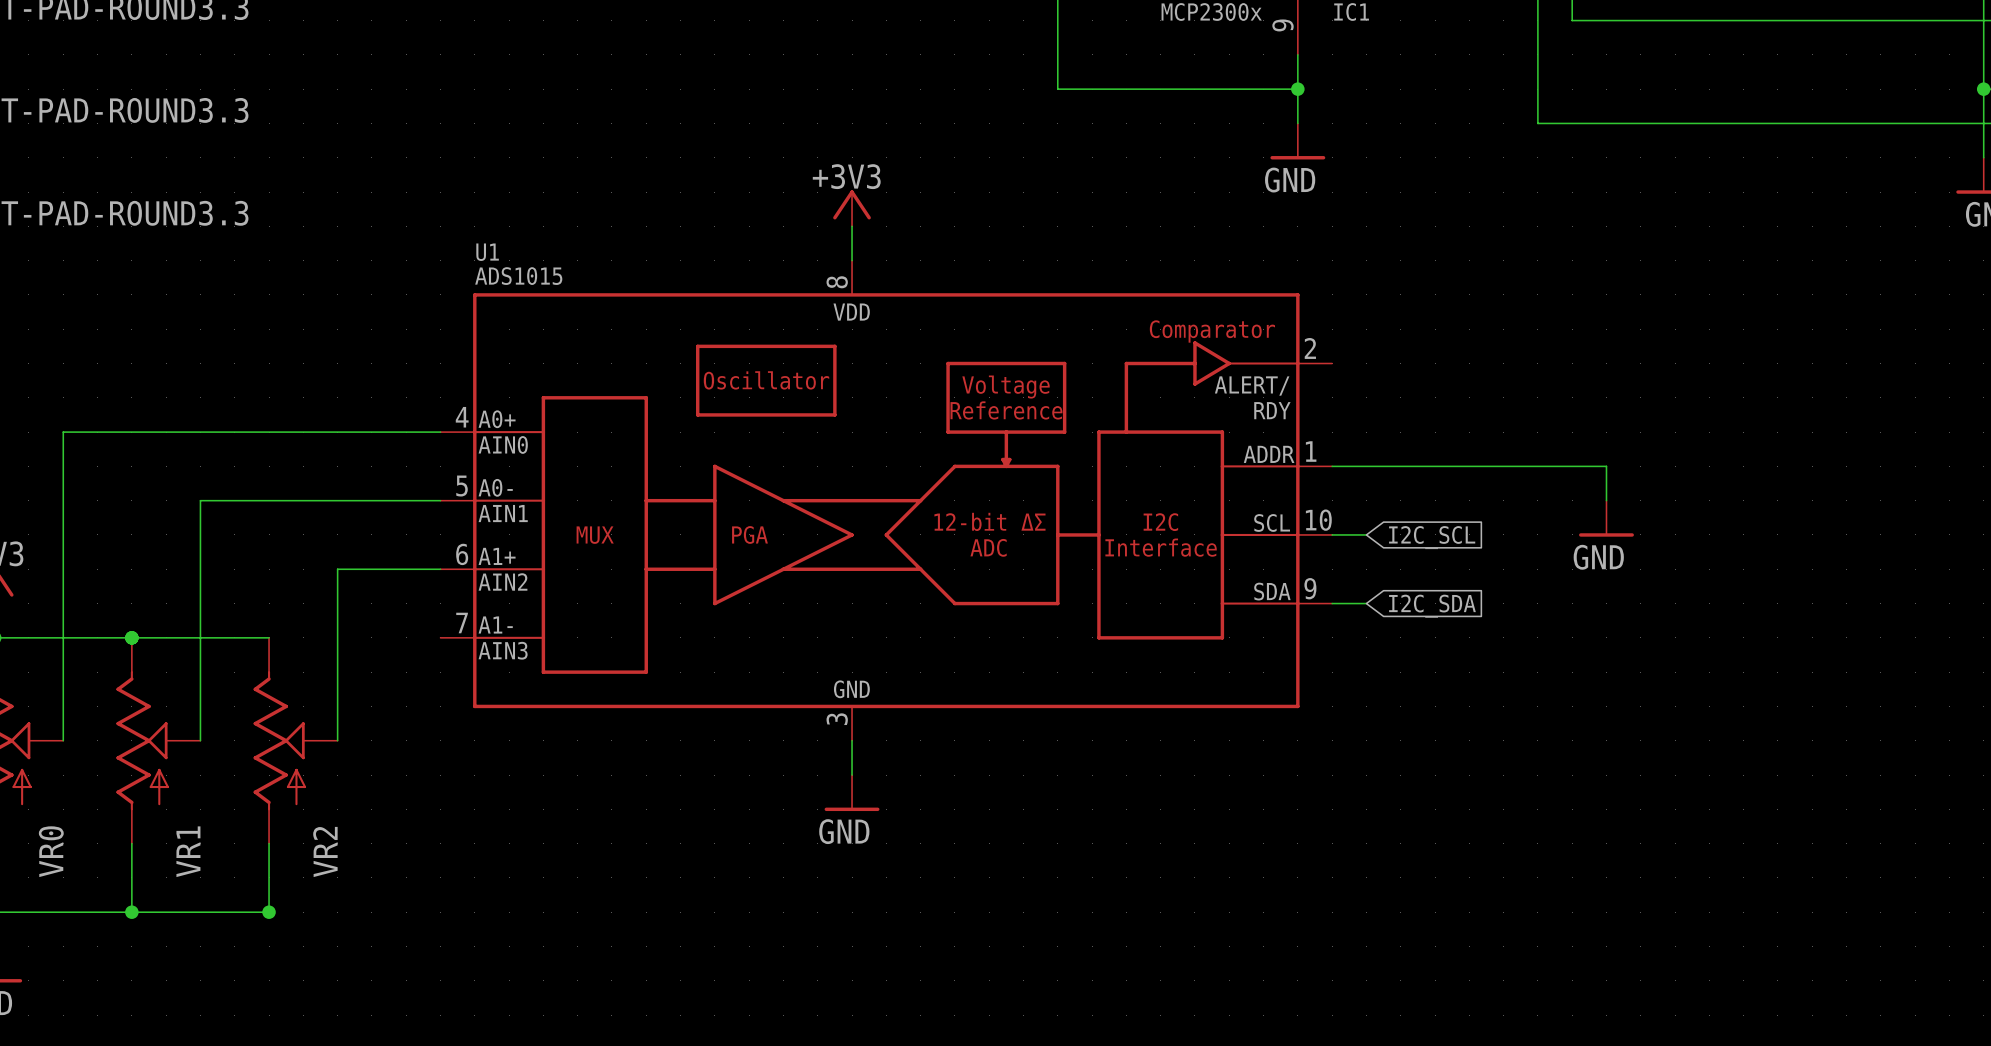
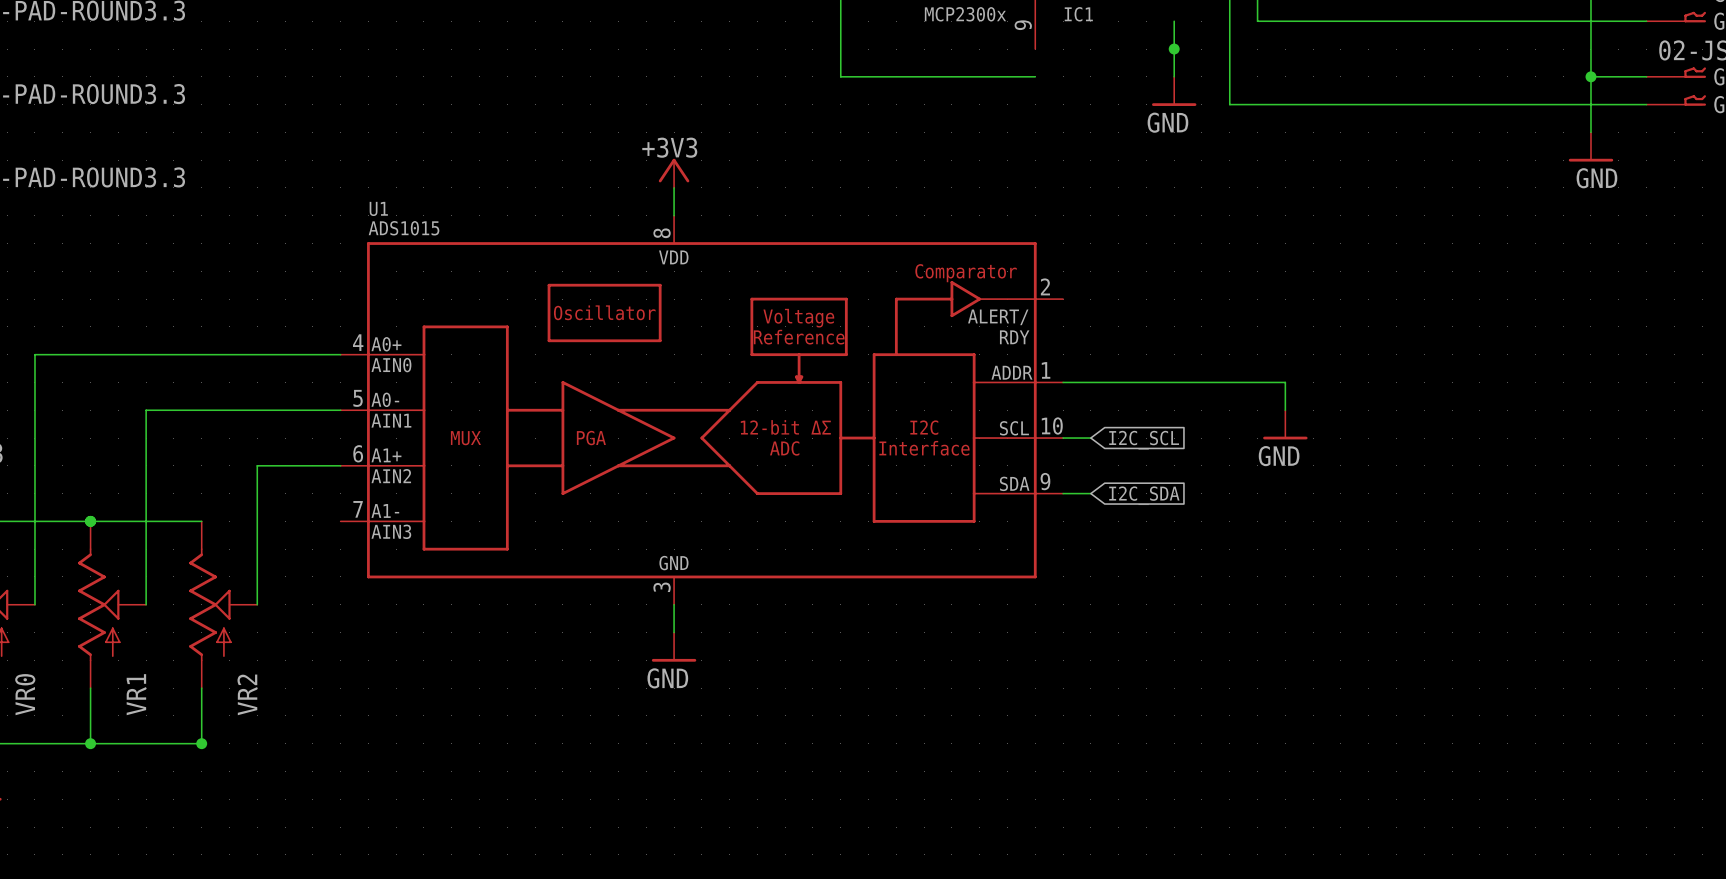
wire: (1297, 54) (1297, 123) -> (1174, 21) (1174, 76)
junction: none -> (1174, 49)
junction: (1297, 89) -> none
power symbol position: GND (1297, 141) -> GND (1174, 91)

